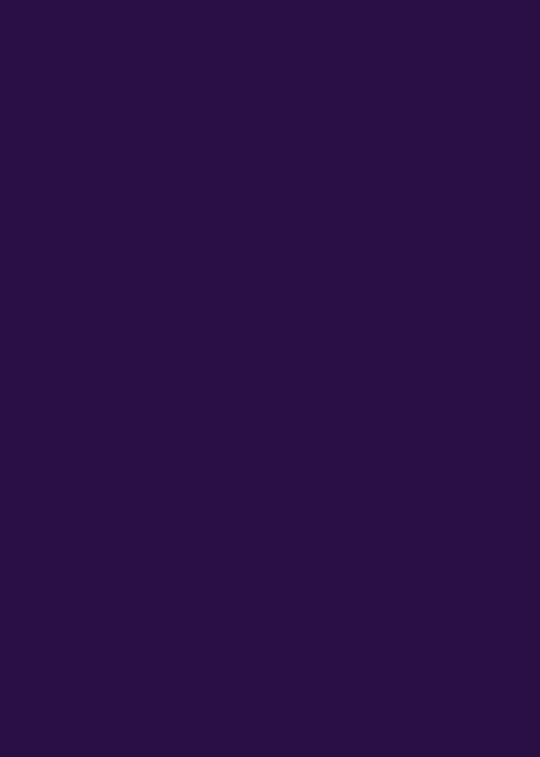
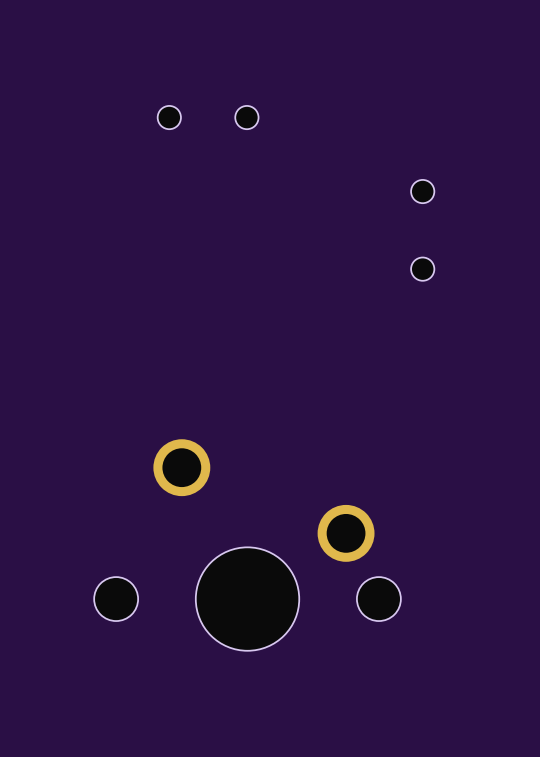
part: none -> (208, 117)
part: none -> (422, 230)
part: none -> (247, 545)

